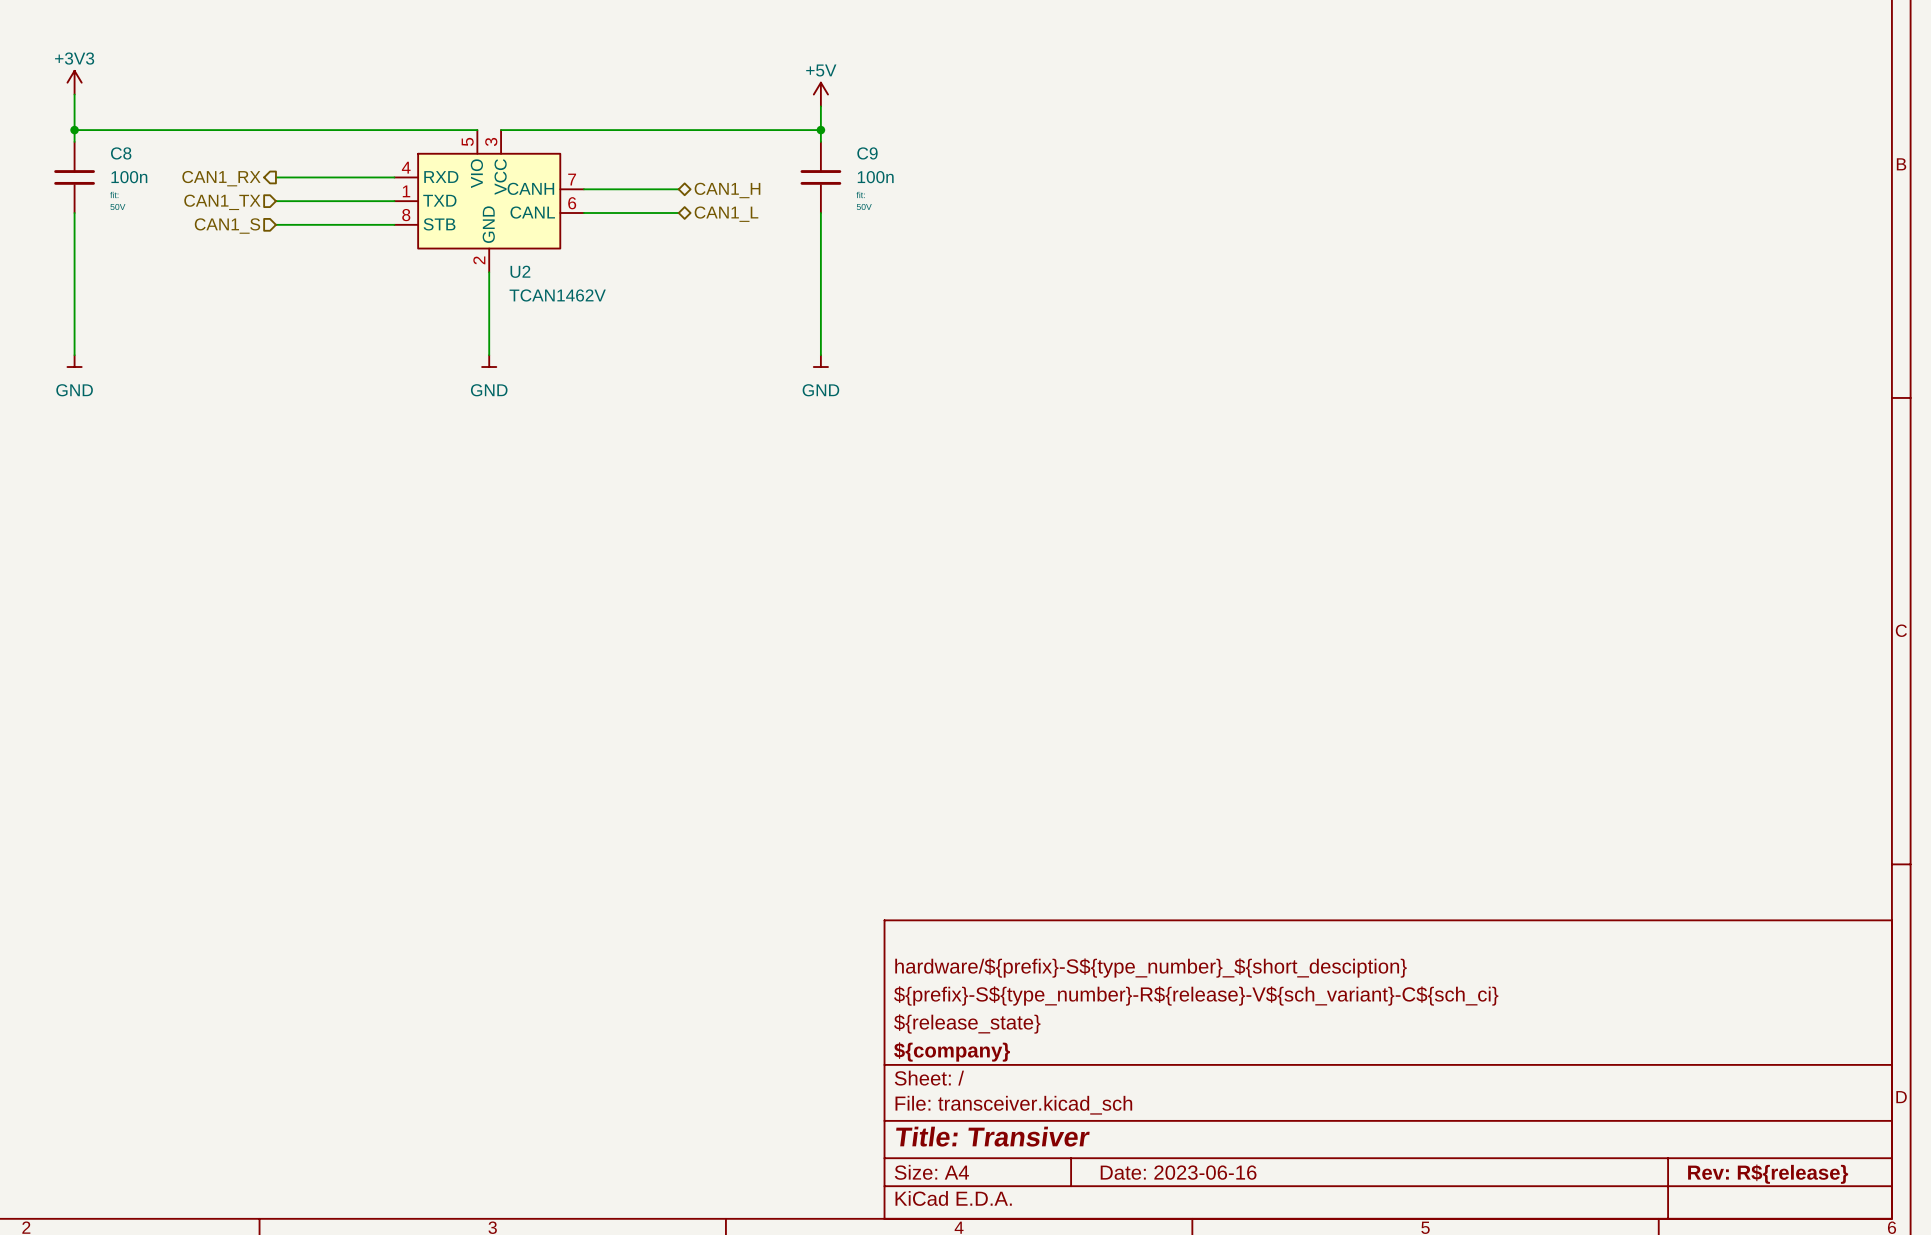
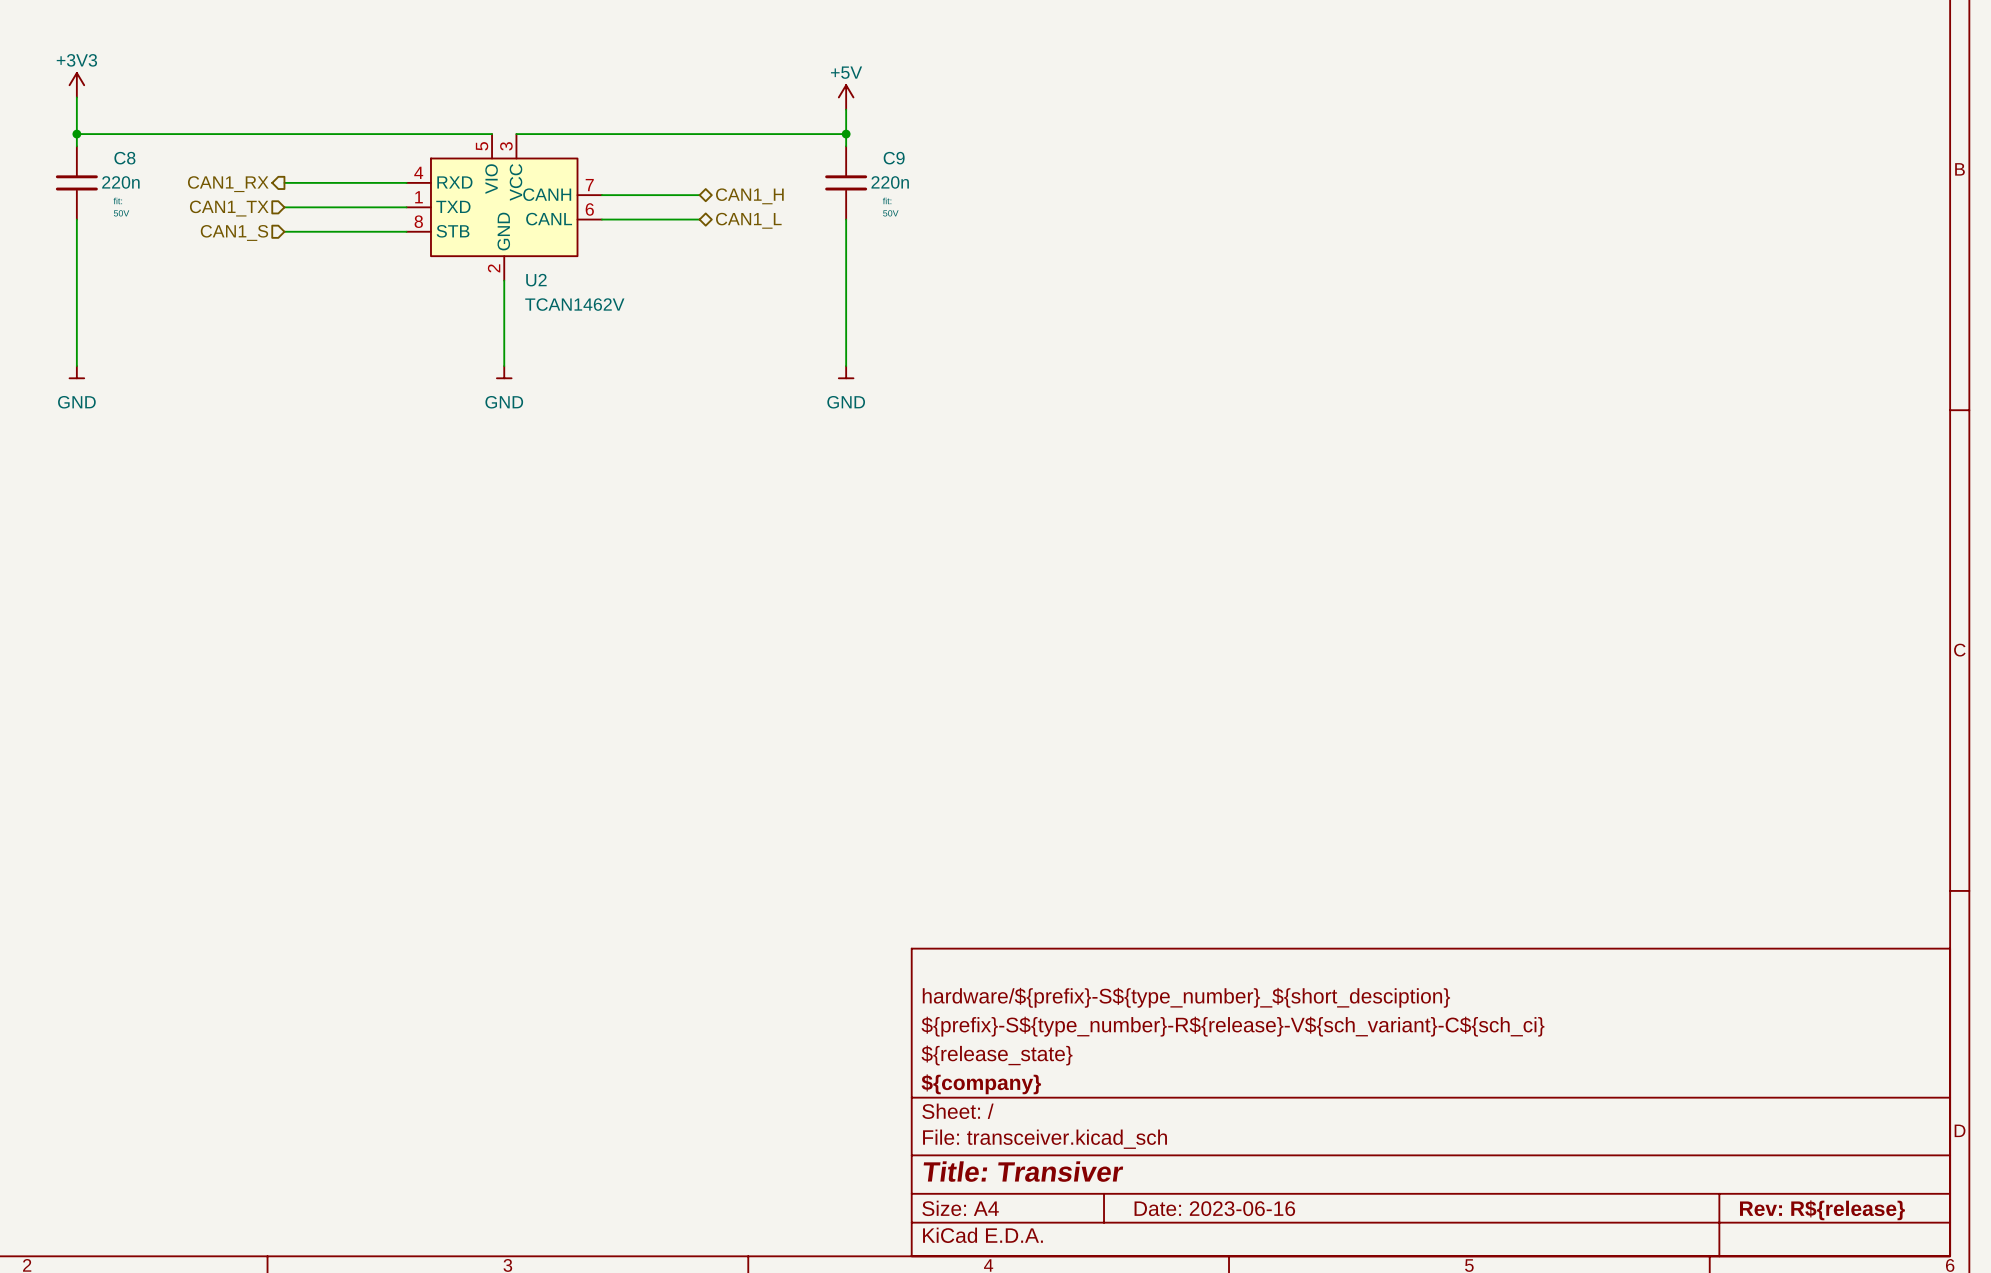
C8 value: none -> 220n (120, 182)
C8 text: 100n (129, 177) -> none
C9 value: none -> 220n (890, 182)
C9 text: 100n (875, 177) -> none

